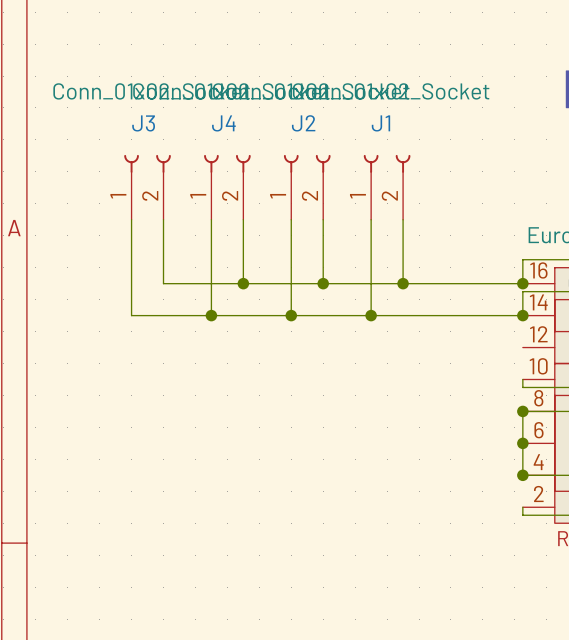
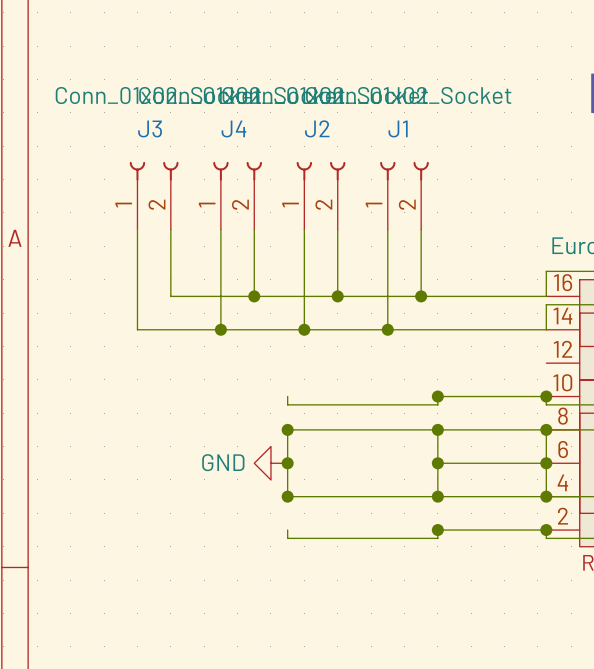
junction: (522, 283) -> none
junction: (522, 315) -> none
wire: none -> (287, 396) (287, 404) (437, 404) (437, 396) (546, 396)
junction: none -> (437, 396)
junction: none -> (546, 396)
junction: none -> (287, 429)
wire: none -> (437, 429) (437, 496)
junction: none -> (437, 429)
wire: none -> (546, 429) (287, 429) (287, 496) (546, 496)
power symbol: none -> GND (270, 463)
junction: none -> (287, 463)
wire: none -> (437, 463) (546, 463)
junction: none -> (437, 463)
junction: none -> (287, 496)
junction: none -> (437, 496)
wire: none -> (287, 530) (287, 538) (437, 538) (437, 530) (546, 530)
junction: none -> (437, 530)
junction: none -> (546, 530)

